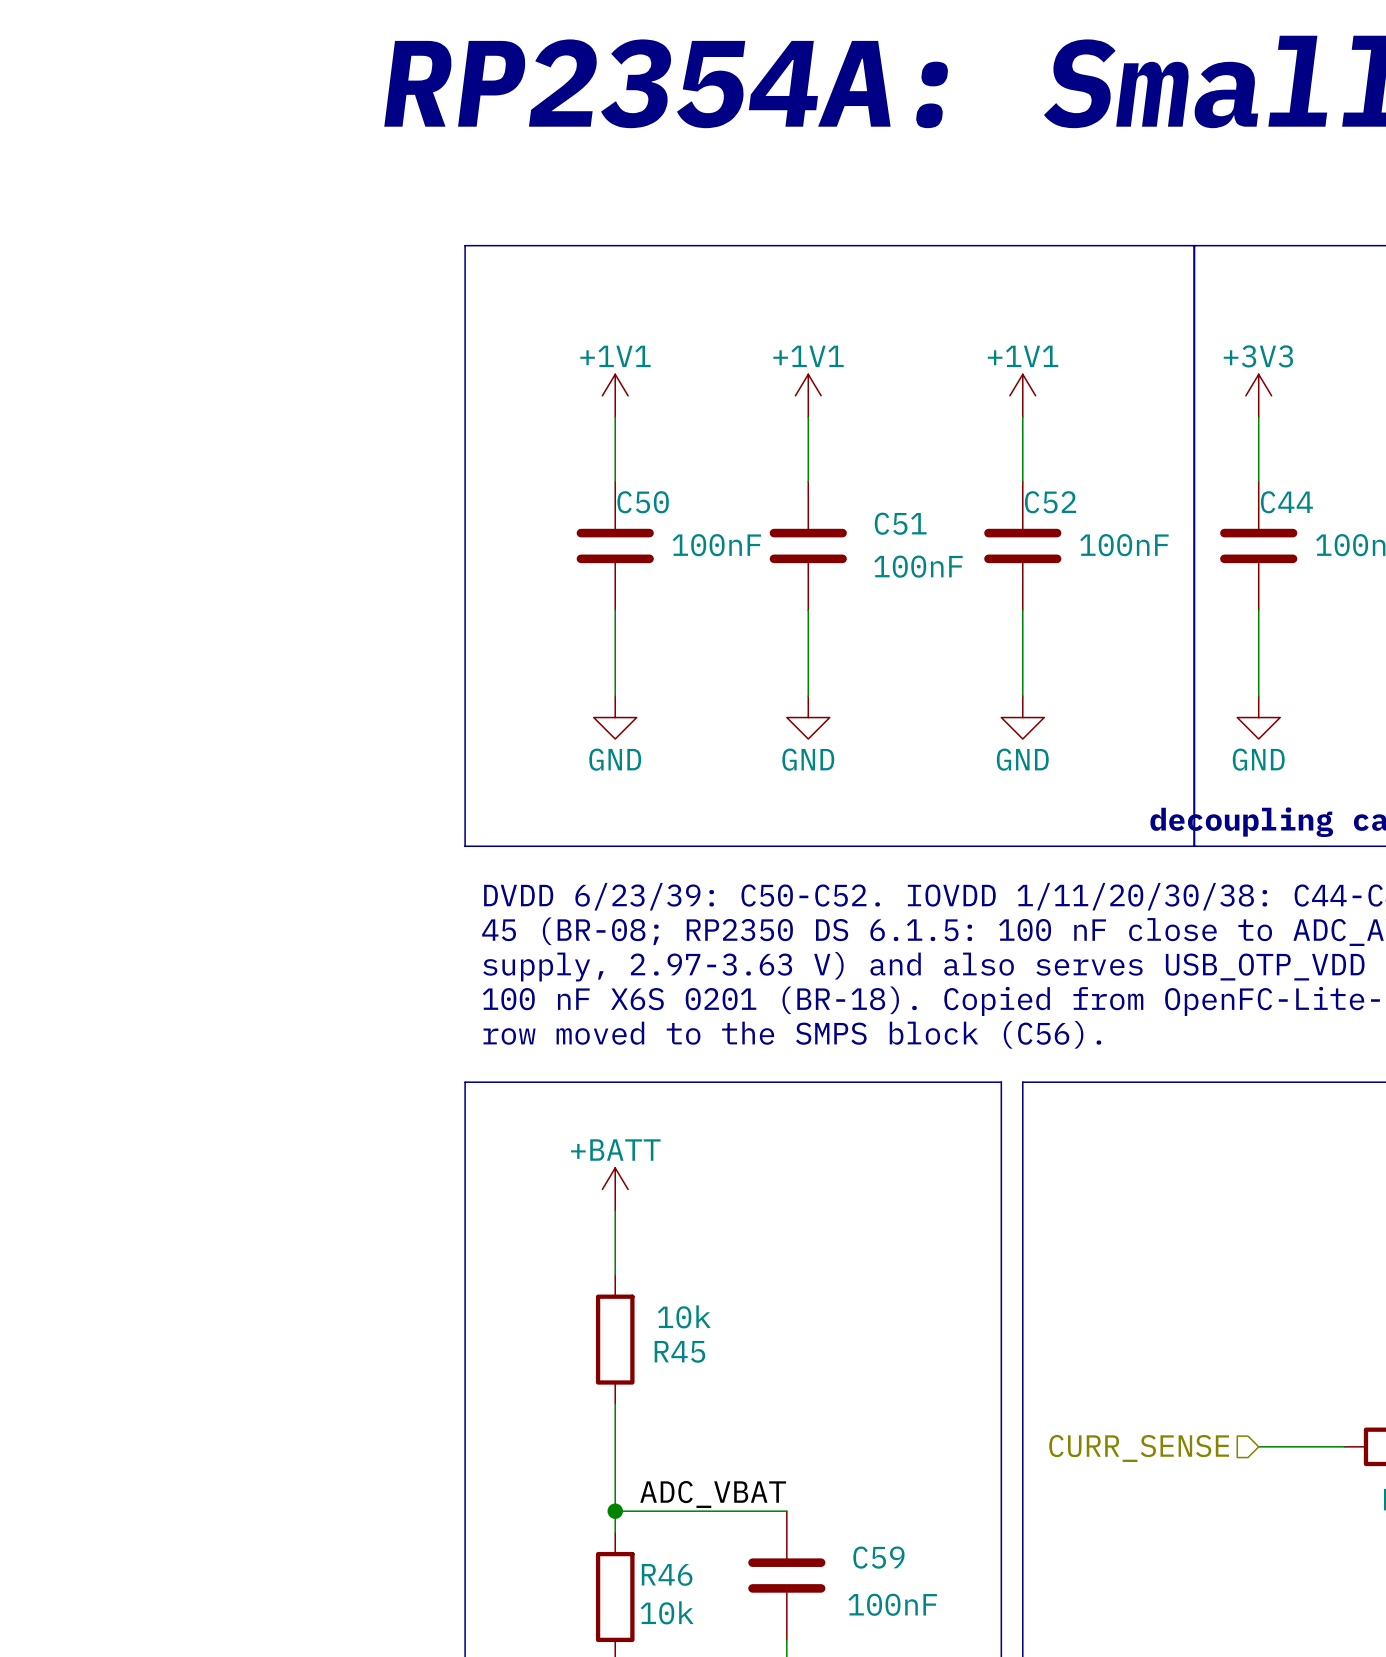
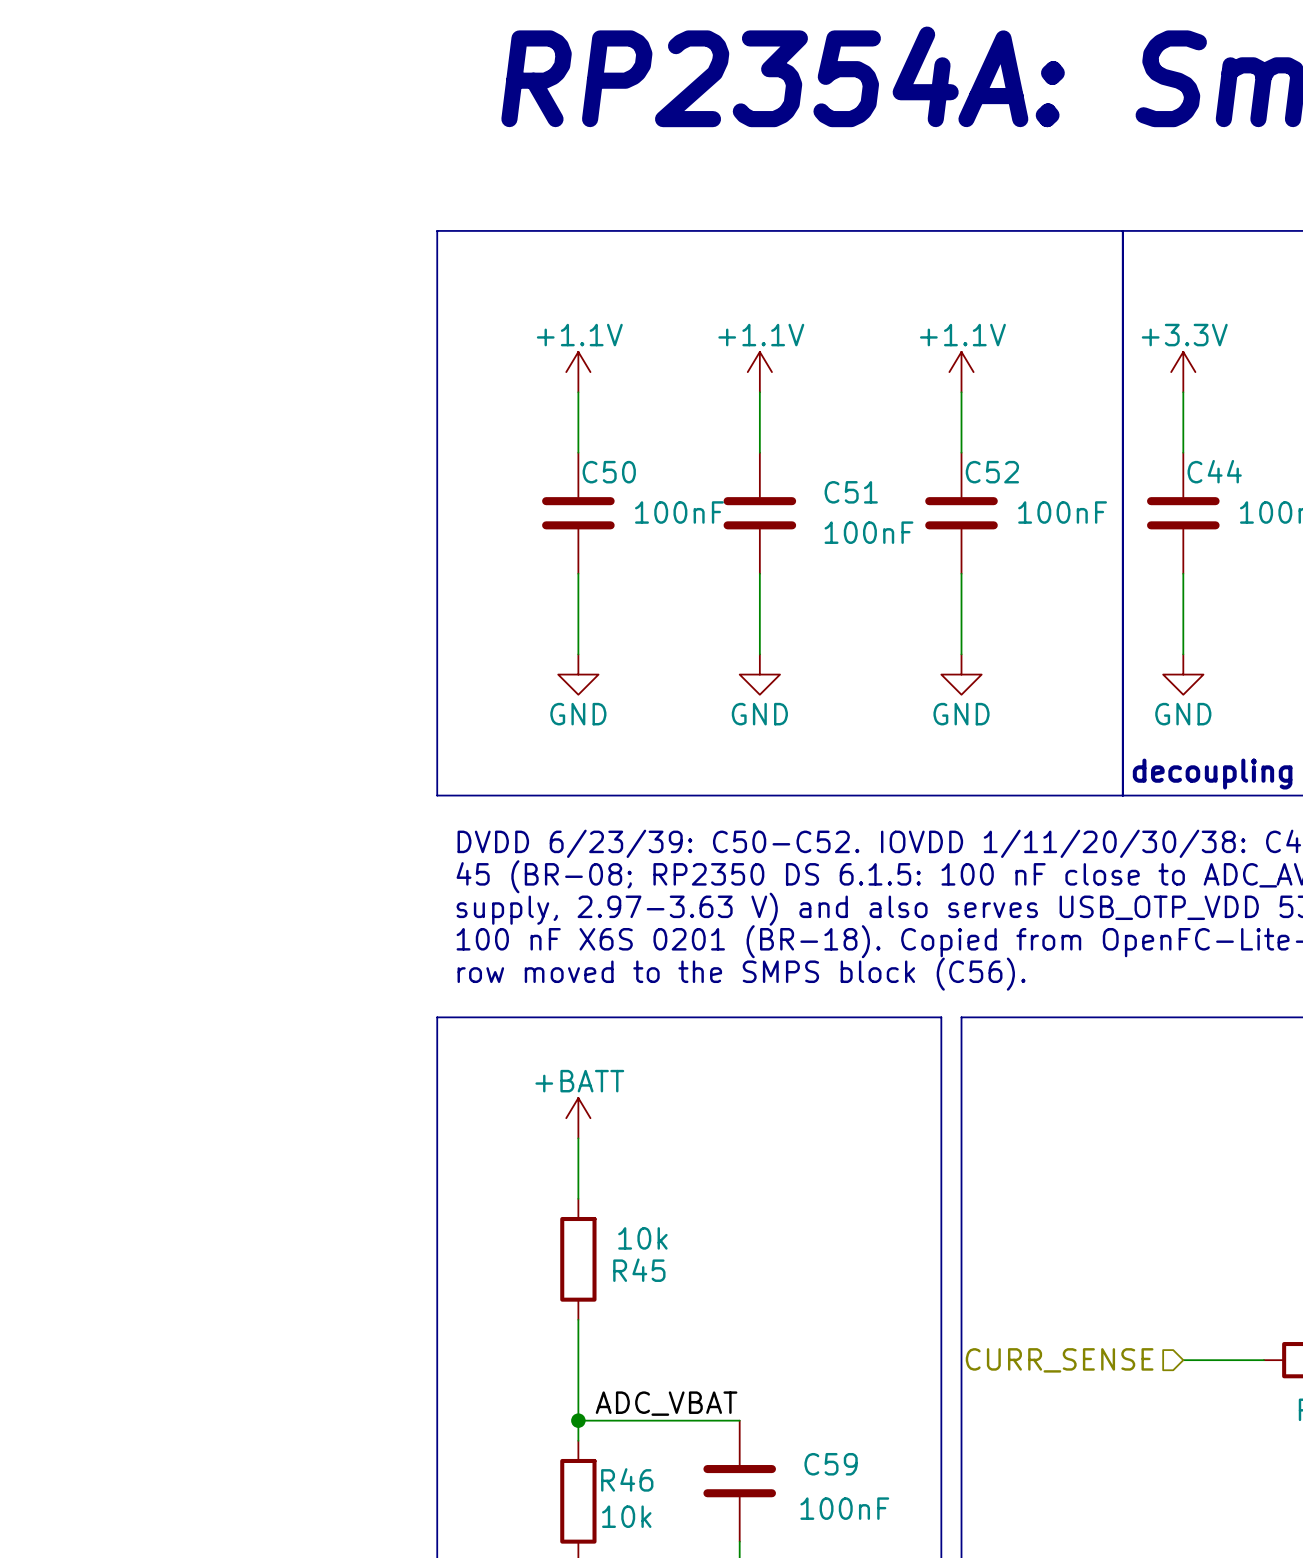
power symbol: +1V1 (615, 395) -> +1.1V (578, 372)
power symbol: +1V1 (808, 395) -> +1.1V (759, 372)
power symbol: +1V1 (1022, 395) -> +1.1V (961, 372)
power symbol: +3V3 (1258, 395) -> +3.3V (1183, 372)

